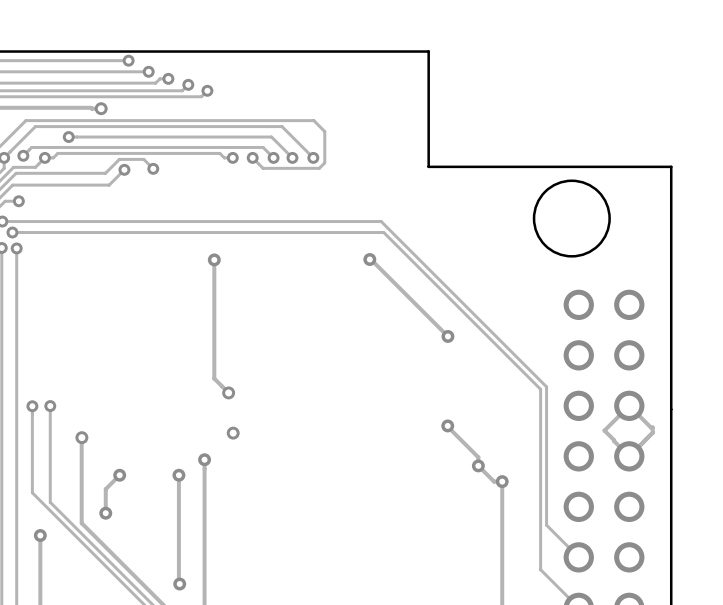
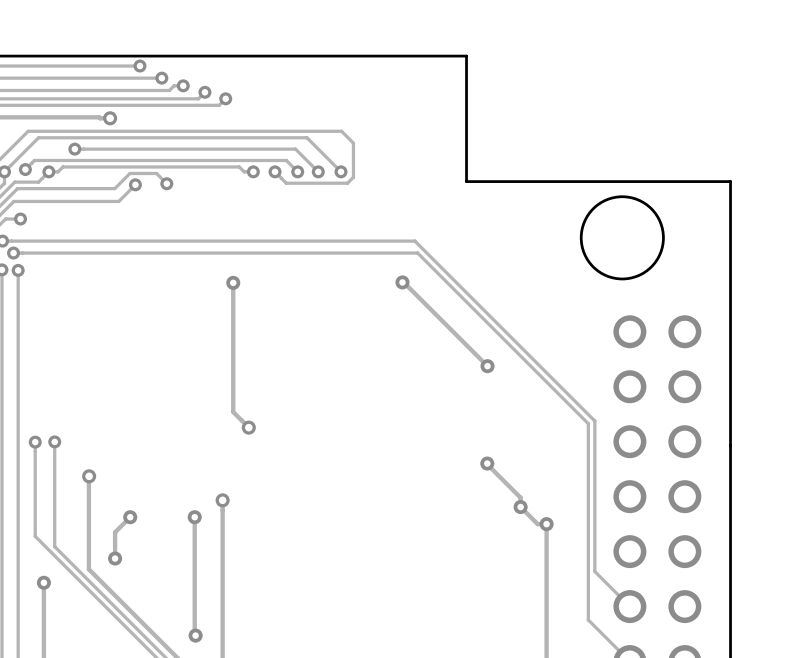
track: (604, 430) (629, 405) (652, 427) (652, 432) (629, 456) (604, 430) -> none
via position: (233, 433) -> (222, 500)
via: (204, 459) -> none

